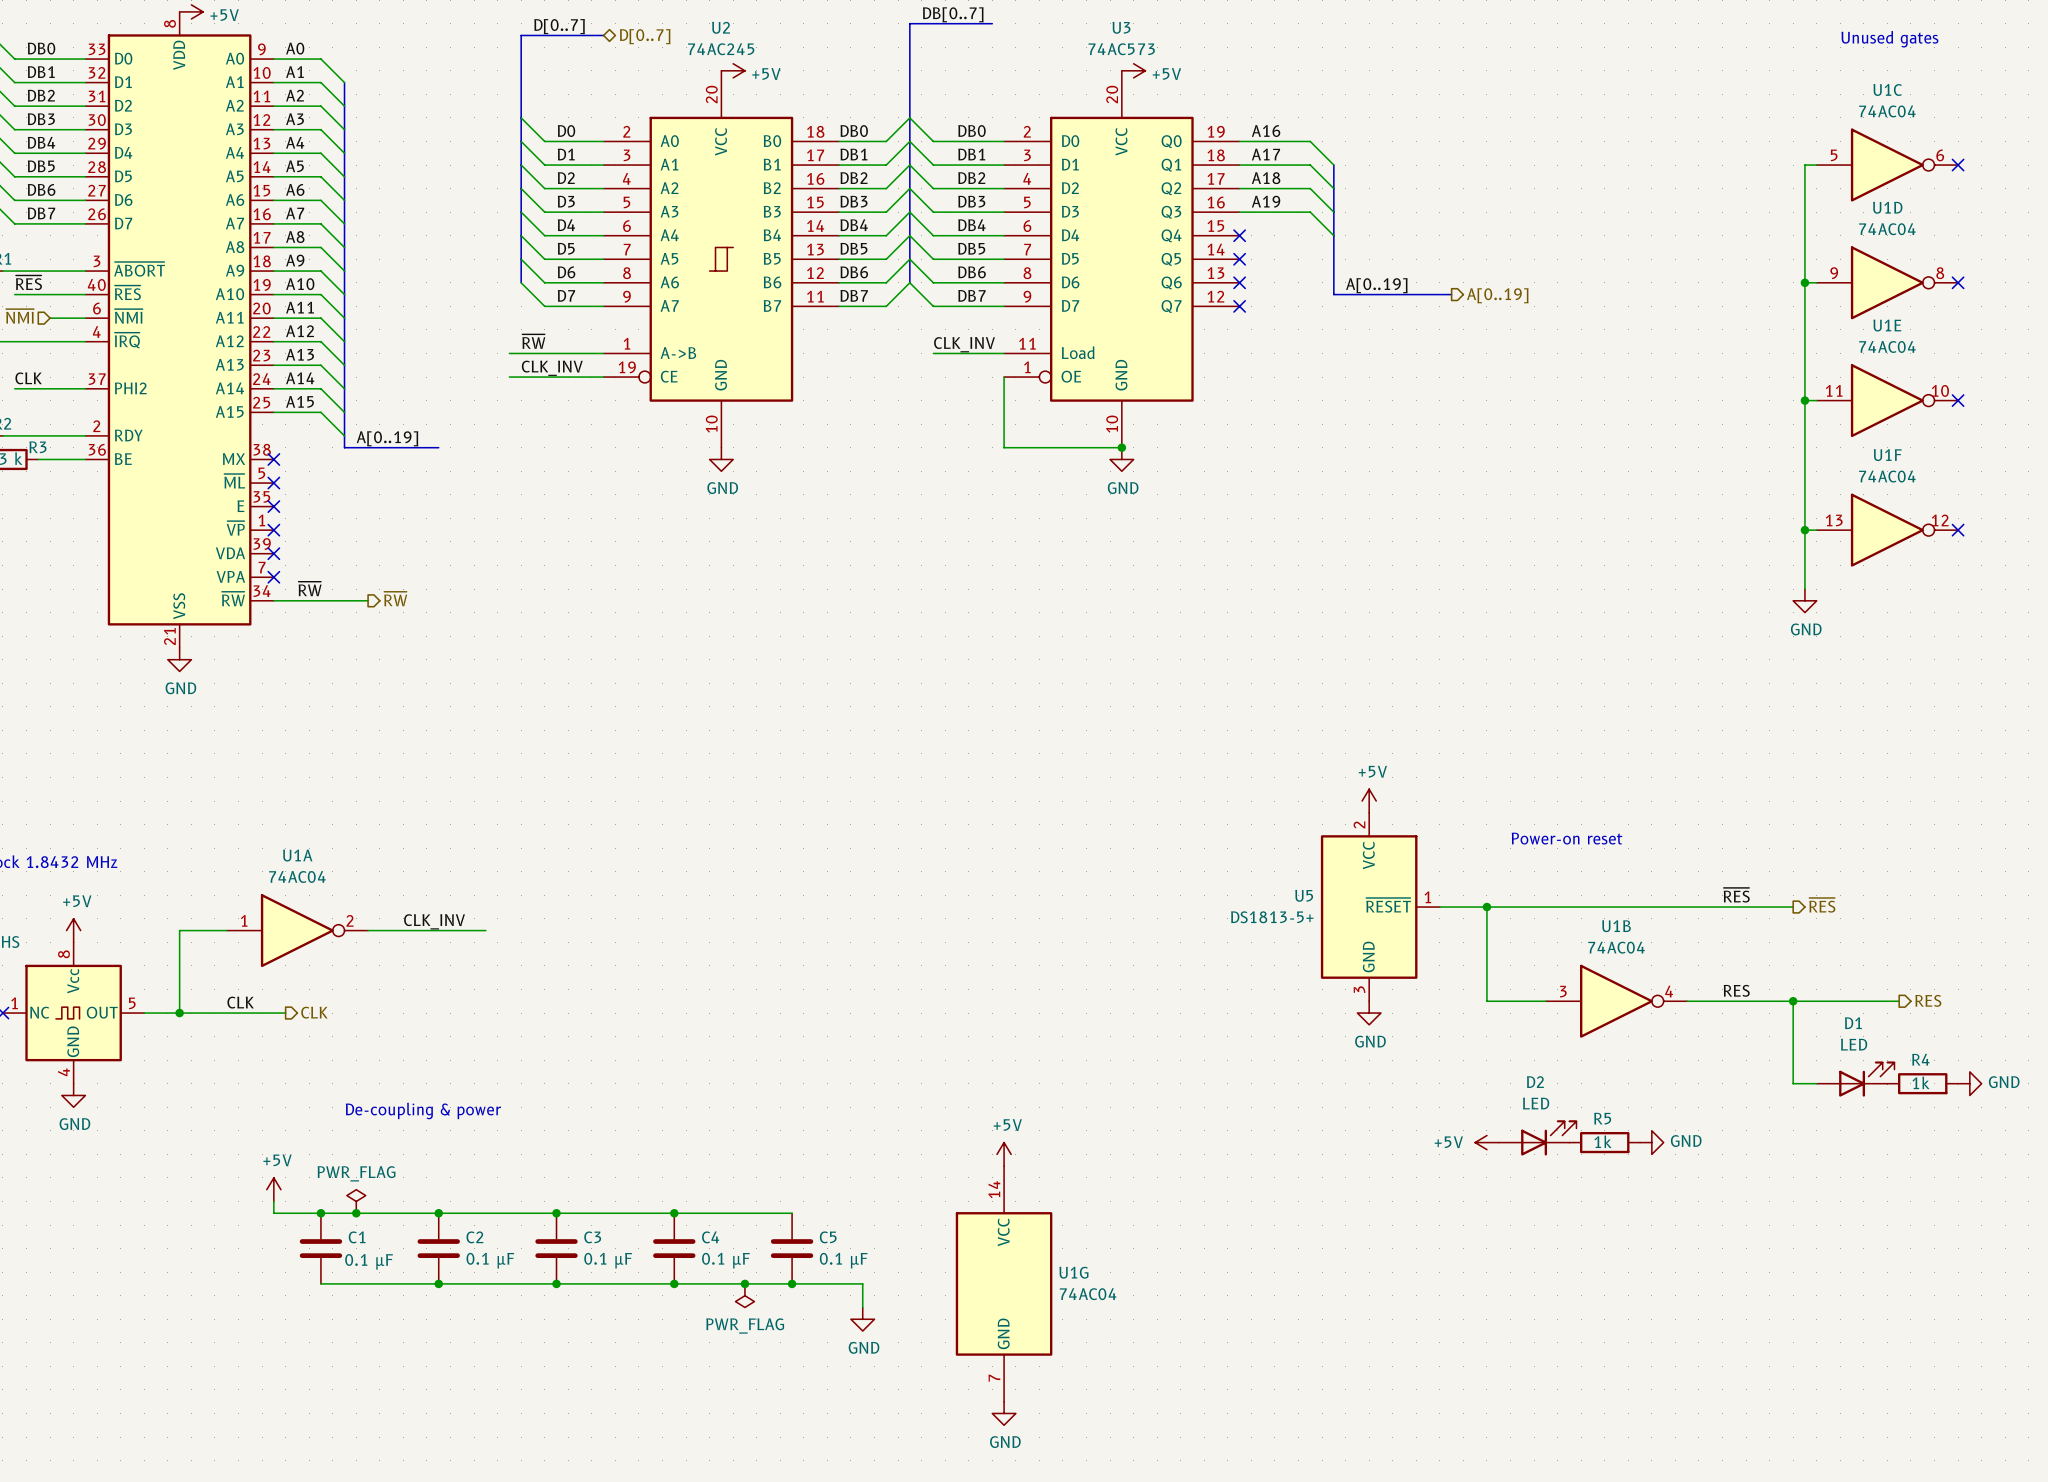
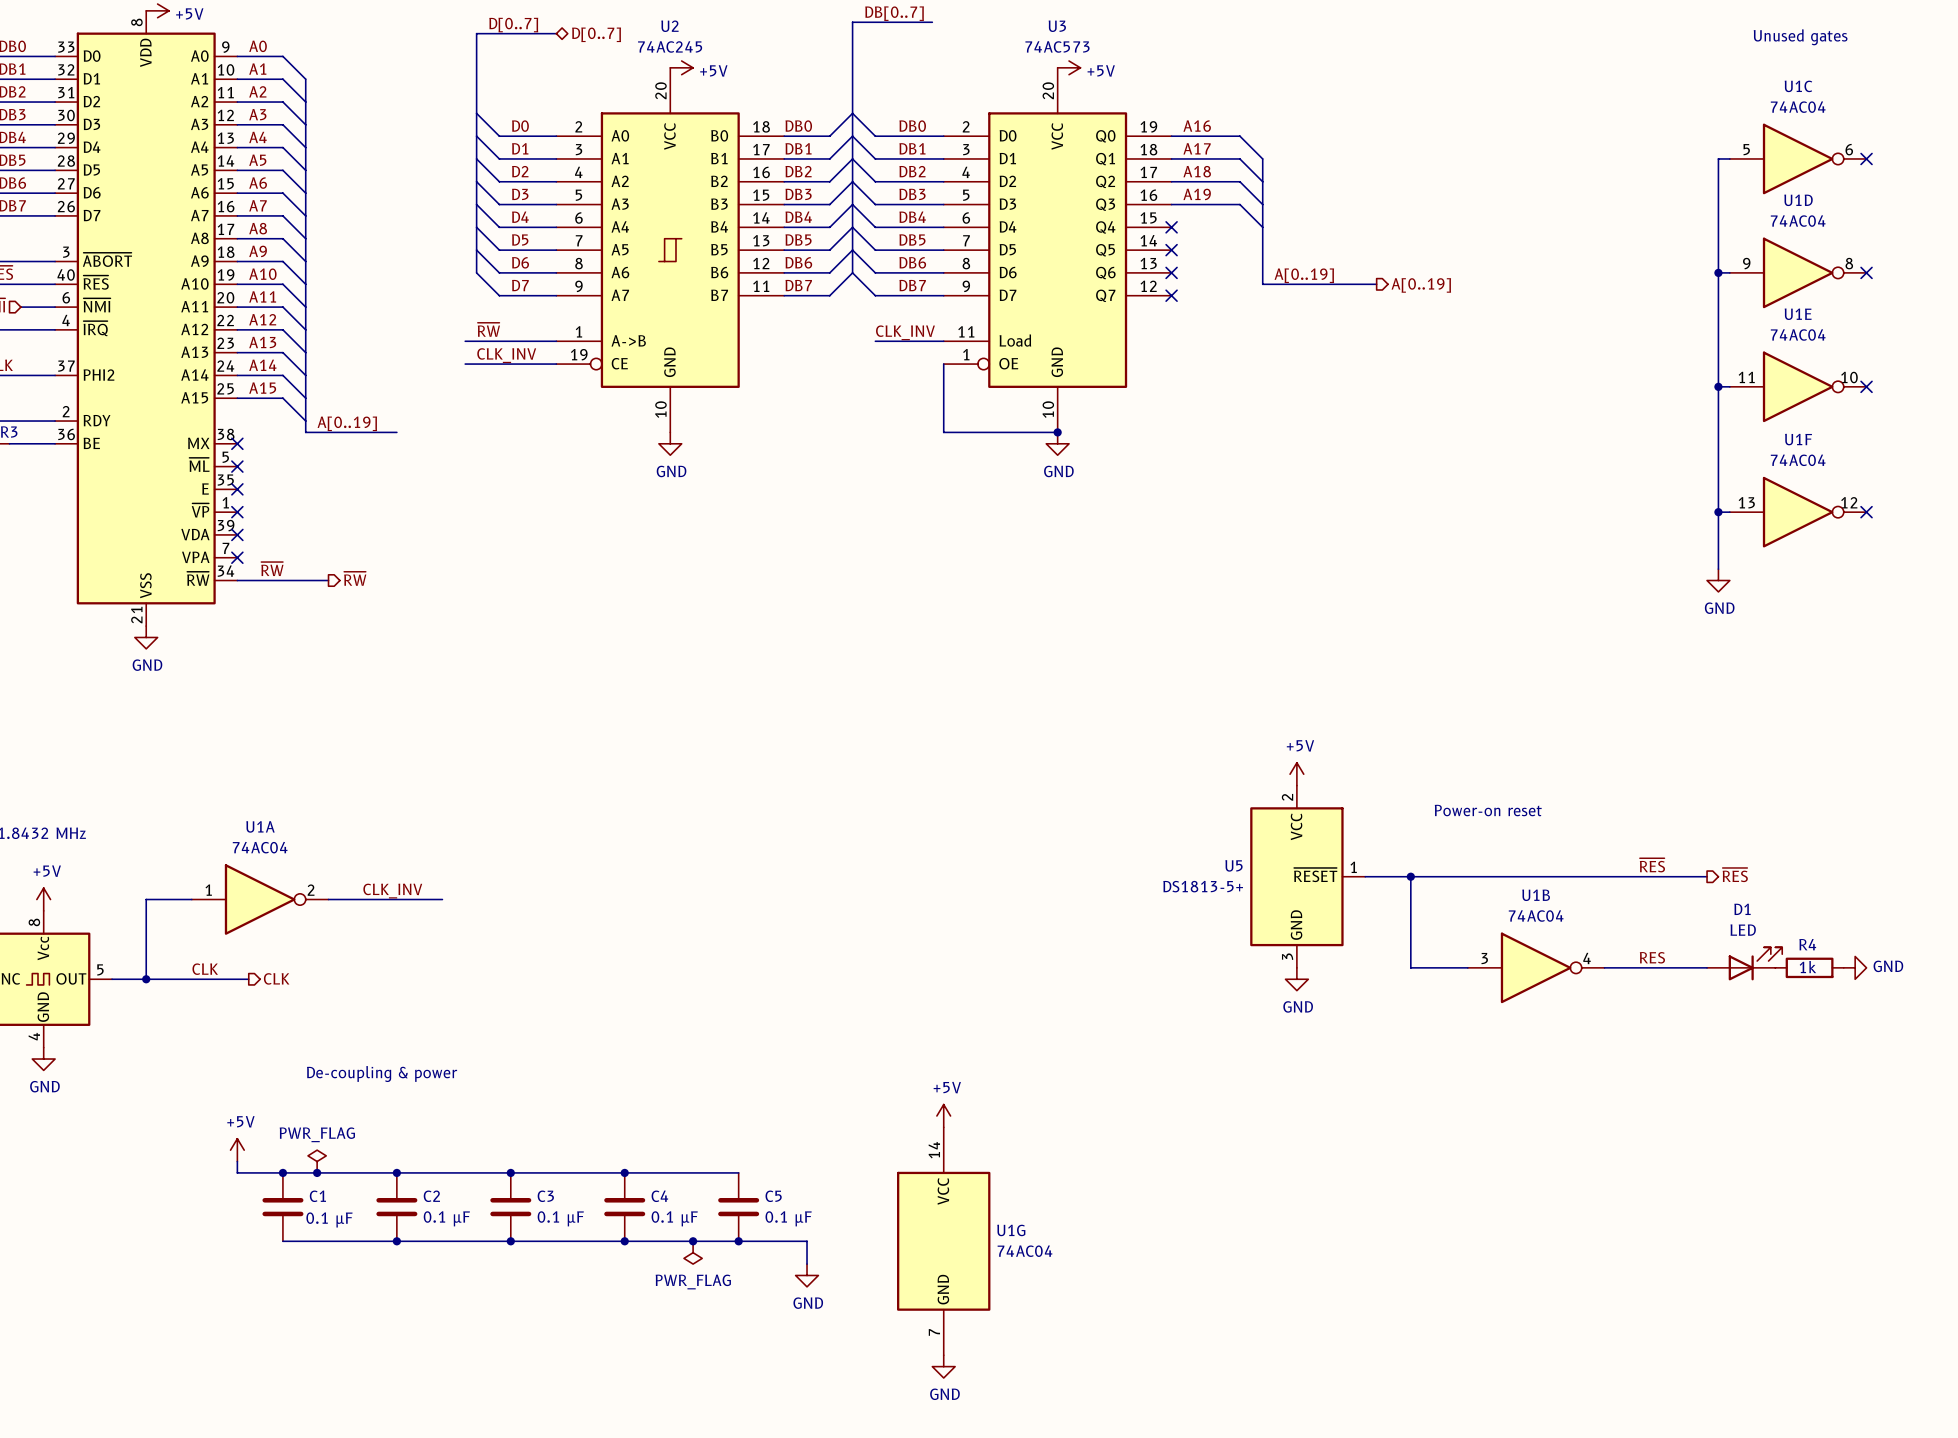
hierarchical label: RES (1928, 1000) -> none
junction: (1793, 1001) -> none
wire: (1899, 1001) (1793, 1001) (1793, 1083) (1816, 1083) -> none
D1 position: (1855, 1079) -> (1744, 963)
R4 position: (1922, 1083) -> (1809, 967)
power symbol position: GND (1969, 1083) -> GND (1855, 967)
D2: LED (1537, 1138) -> none
power symbol: +5V (1486, 1142) -> none
R5: 1k (1604, 1142) -> none
power symbol: GND (1651, 1142) -> none

